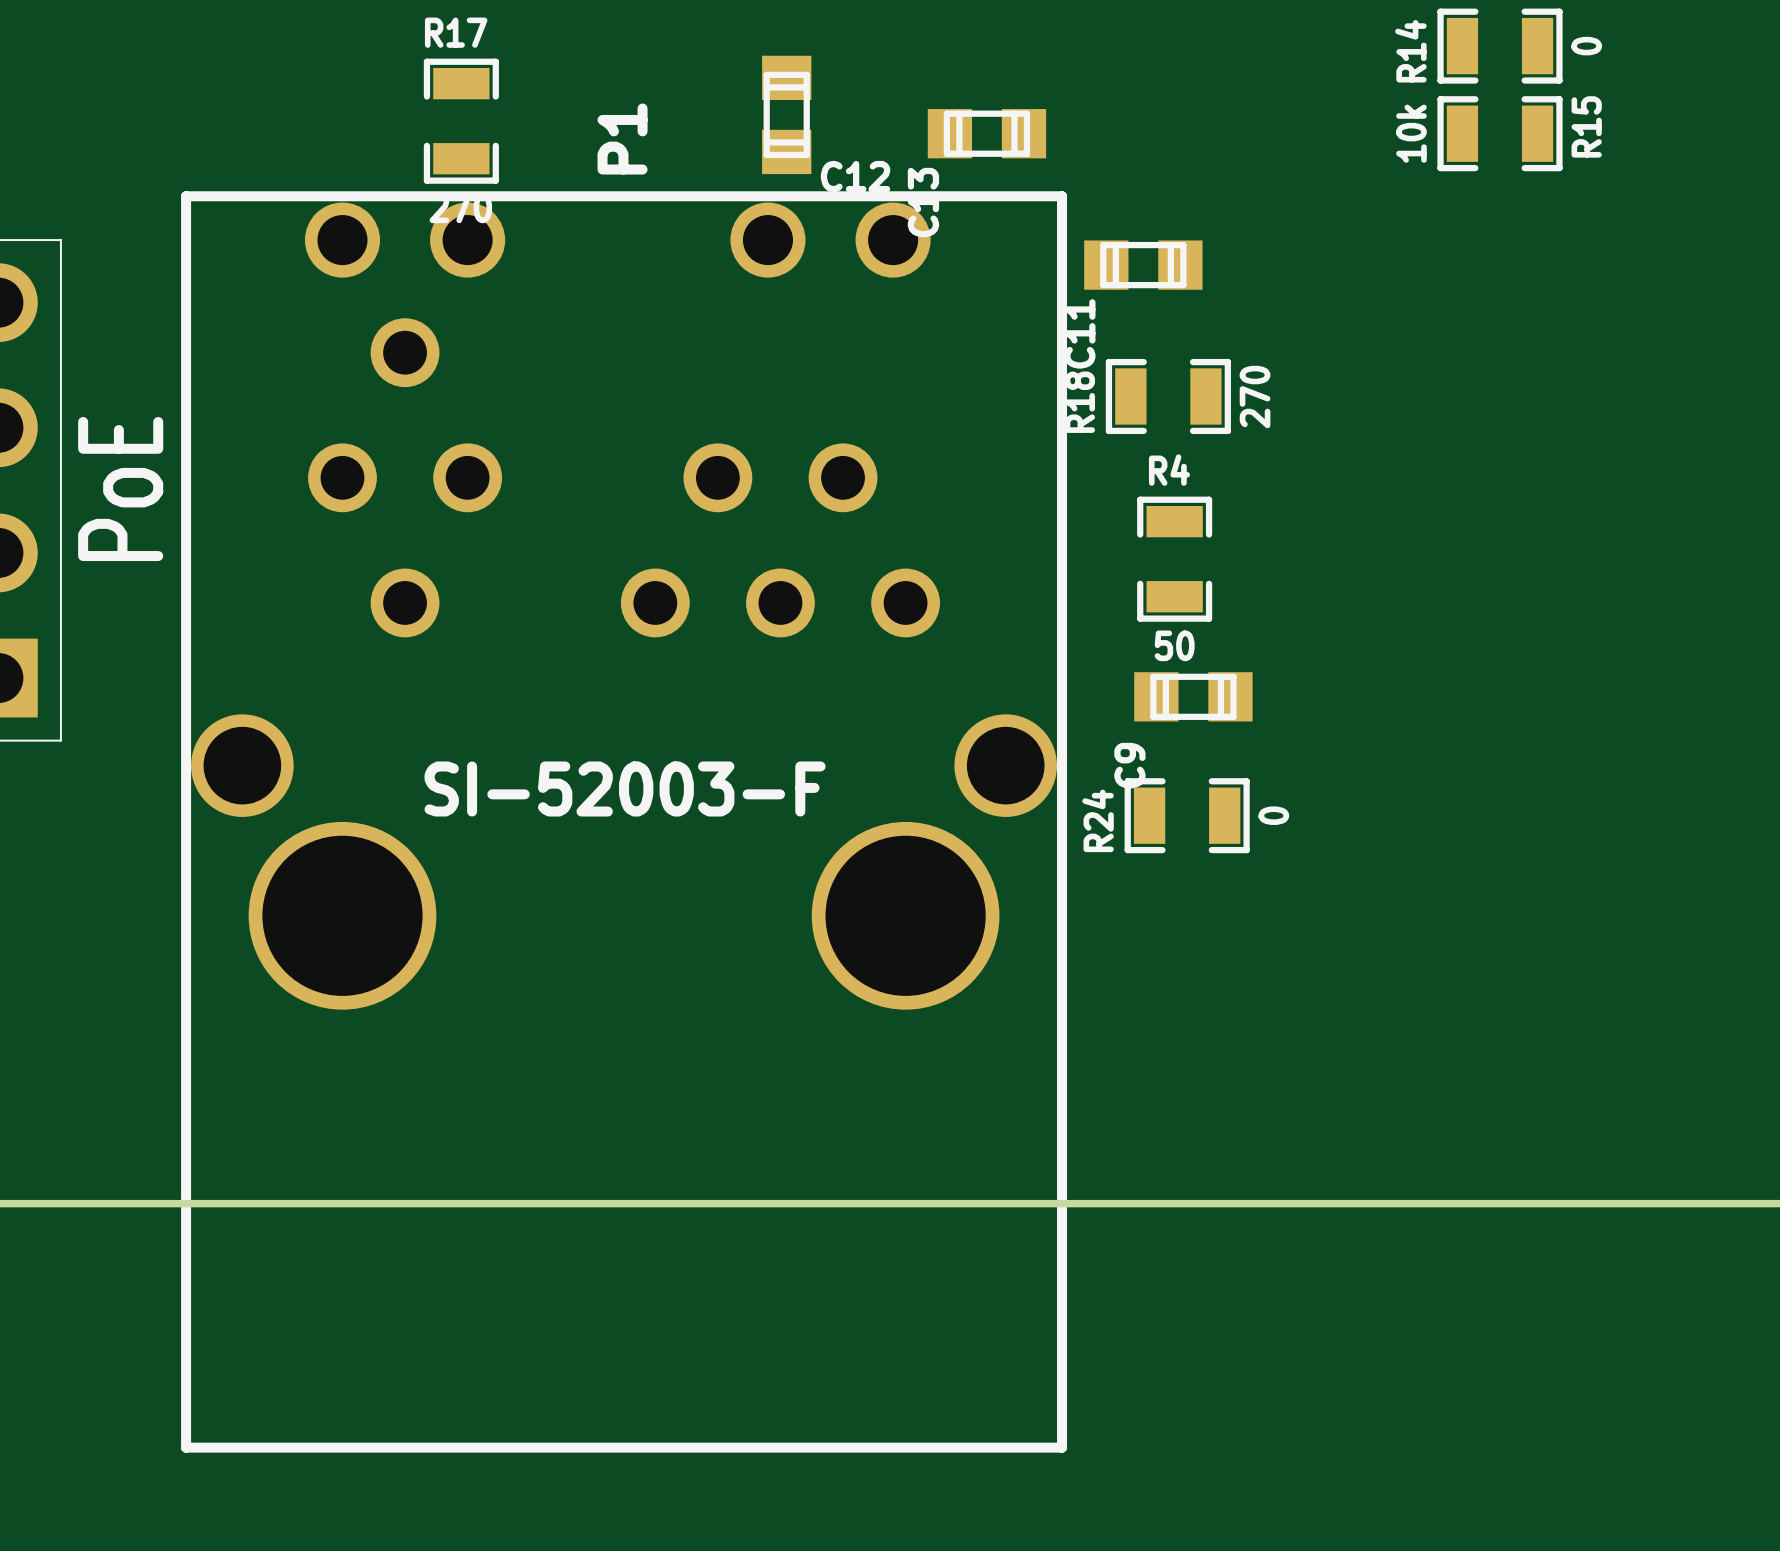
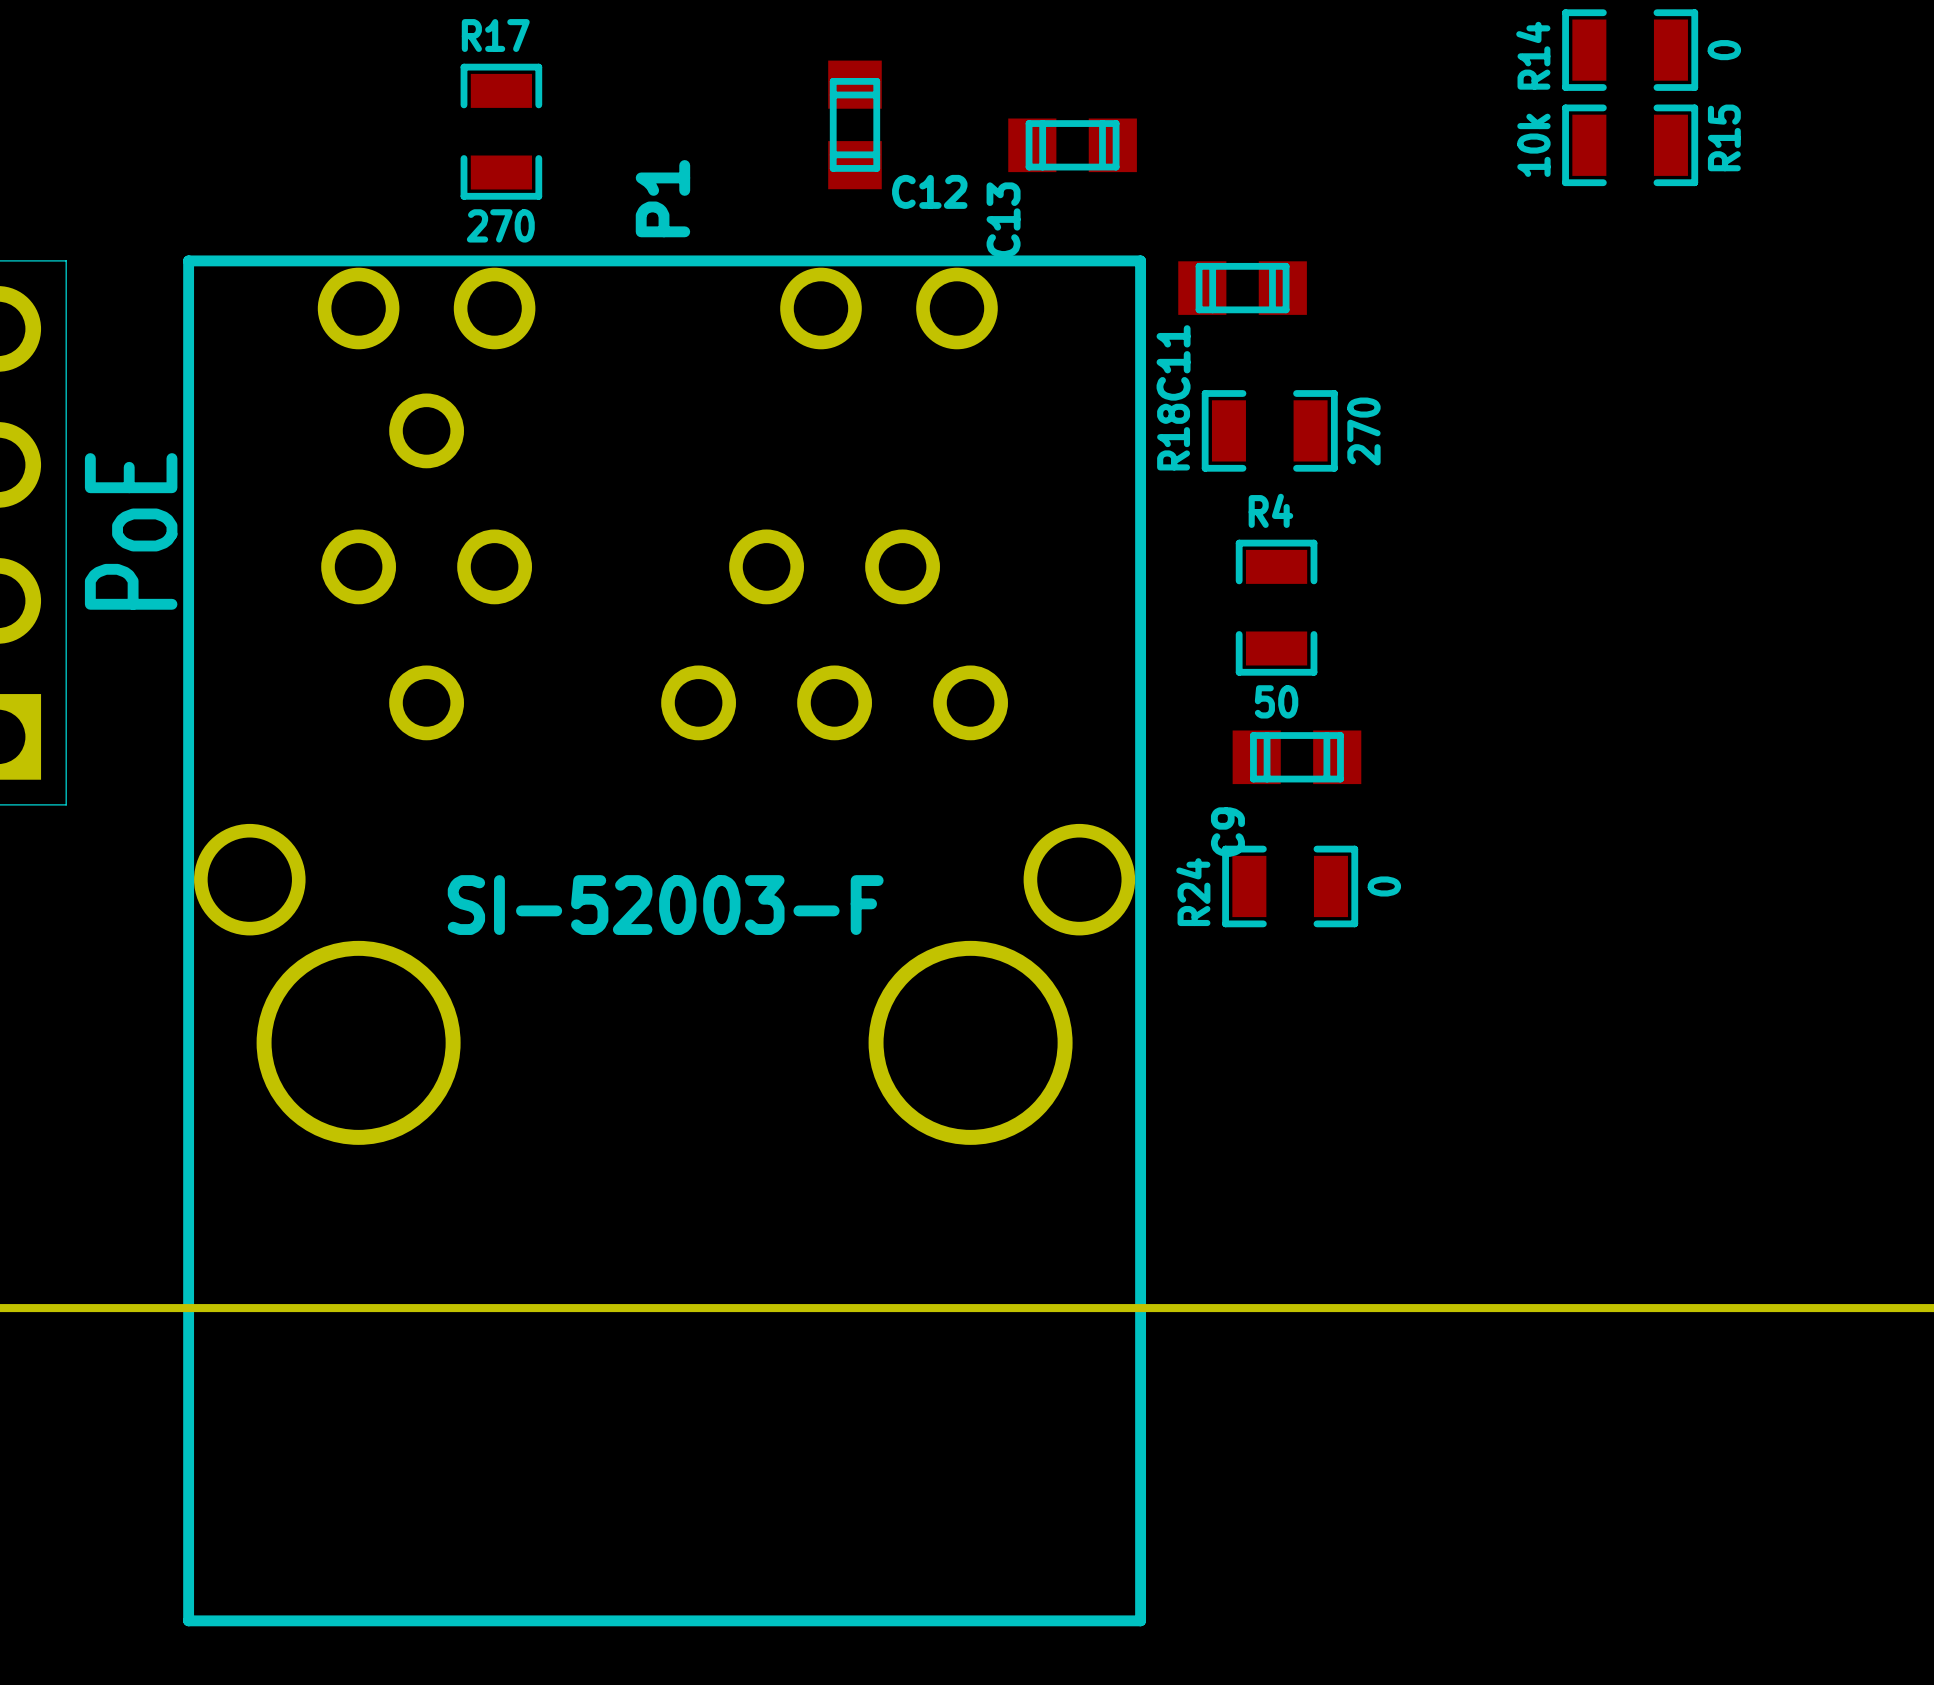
P1 position: (624, 821) -> (664, 940)

